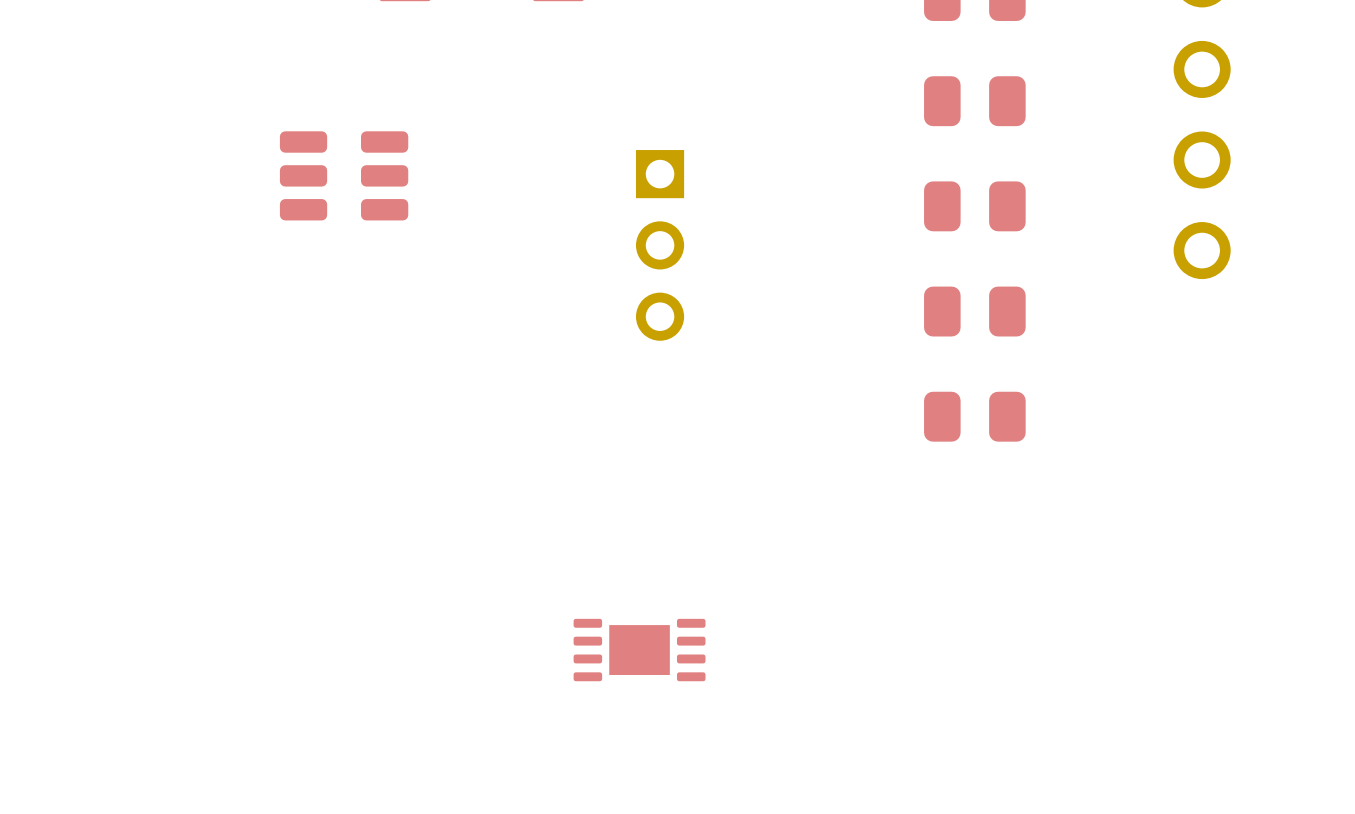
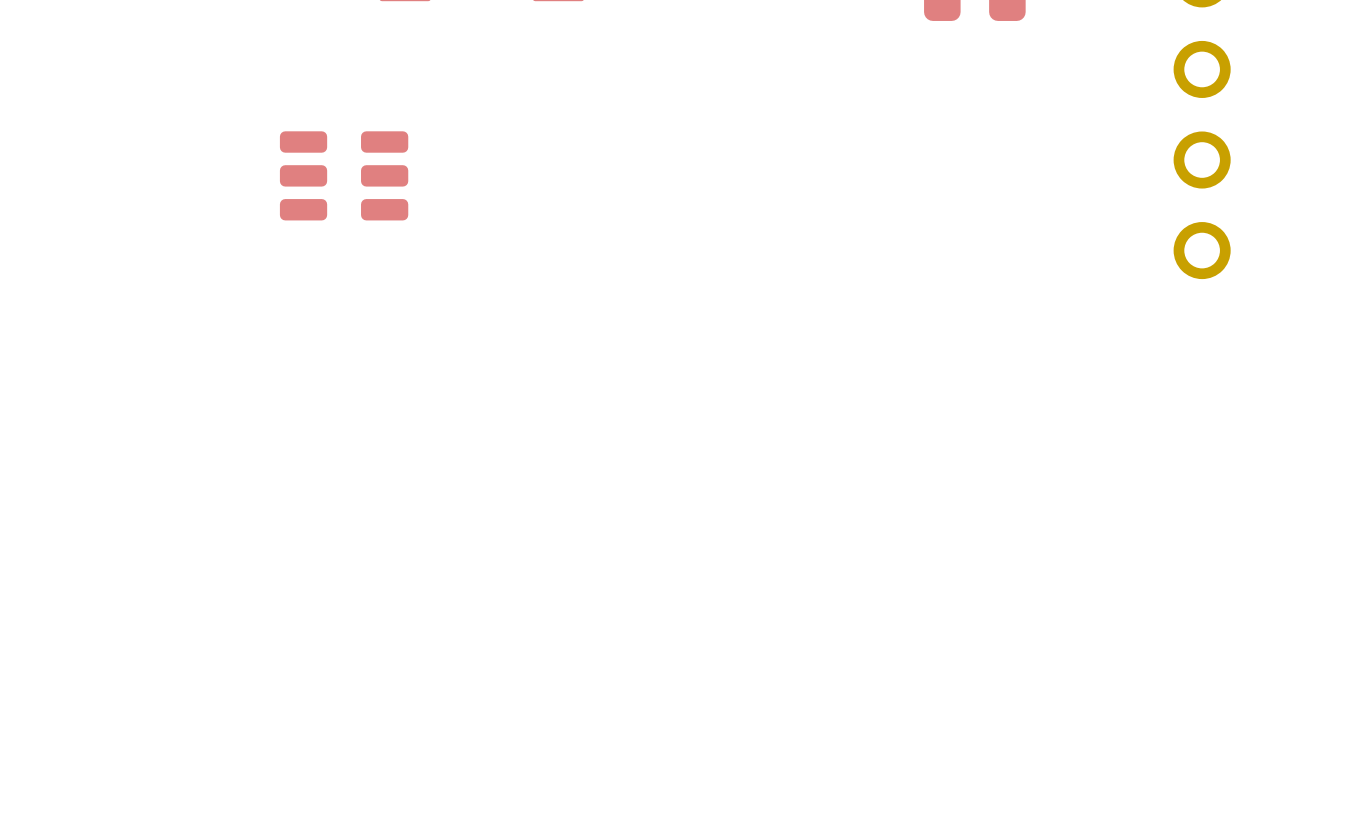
part: (974, 101) -> none
part: (974, 206) -> none
part: (660, 245) -> none
part: (974, 311) -> none
part: (974, 416) -> none
part: (639, 650) -> none

